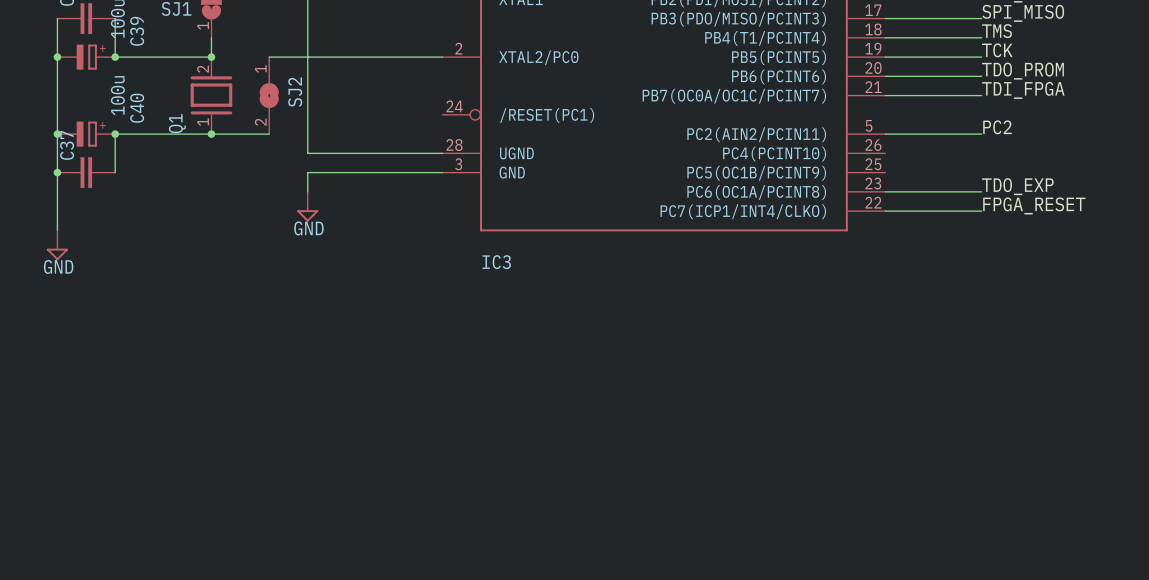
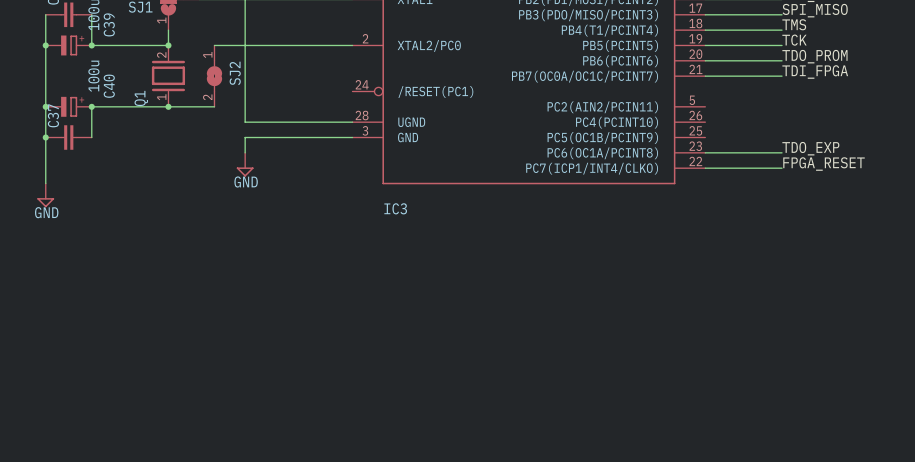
label: PC2 (997, 127) -> none
wire: (885, 134) (981, 134) -> none

